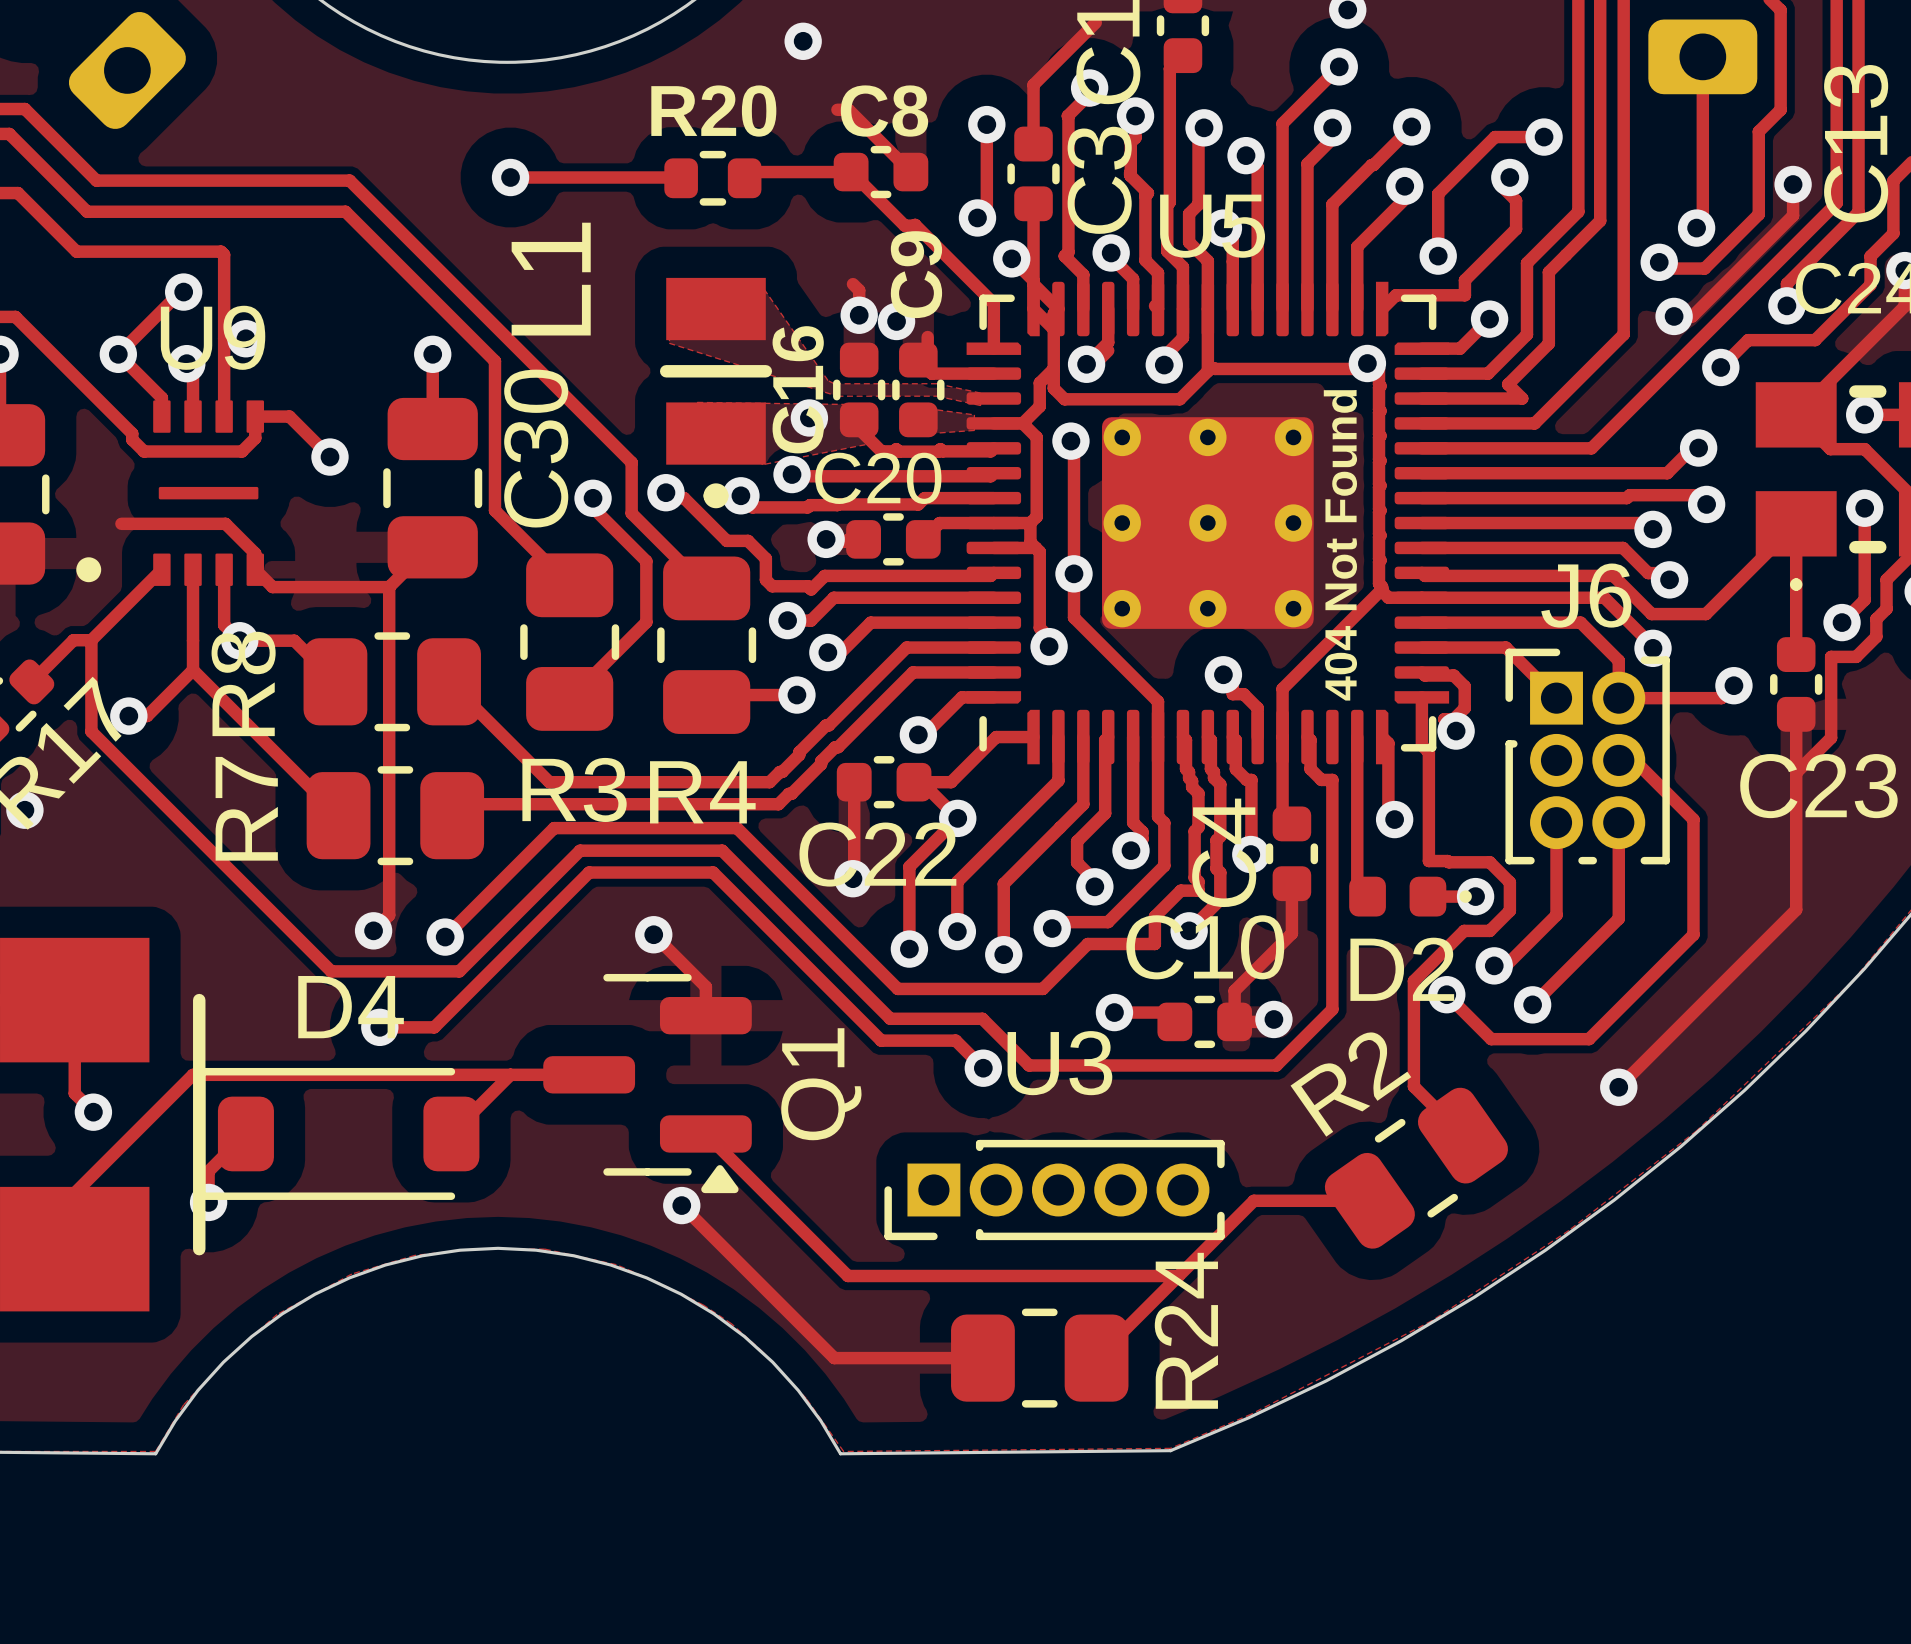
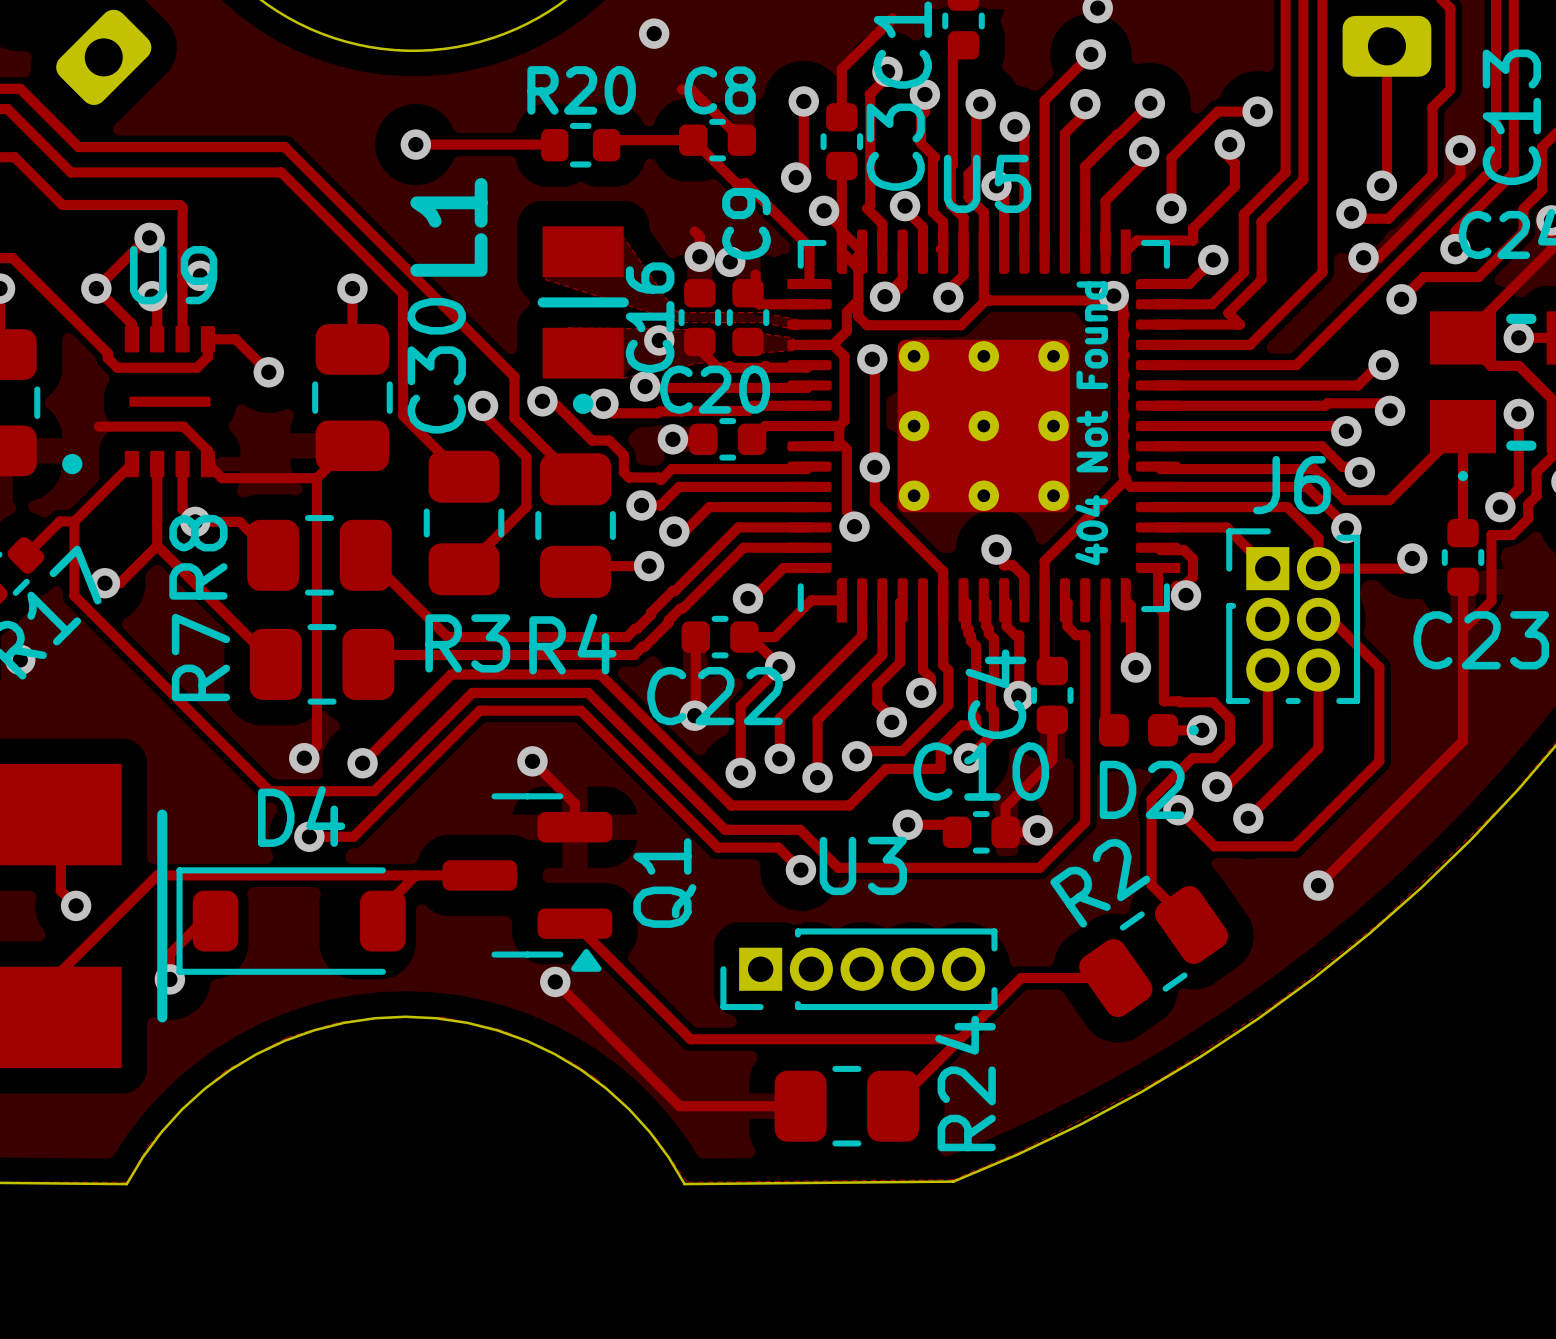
D4 position: (338, 1133) -> (291, 921)

